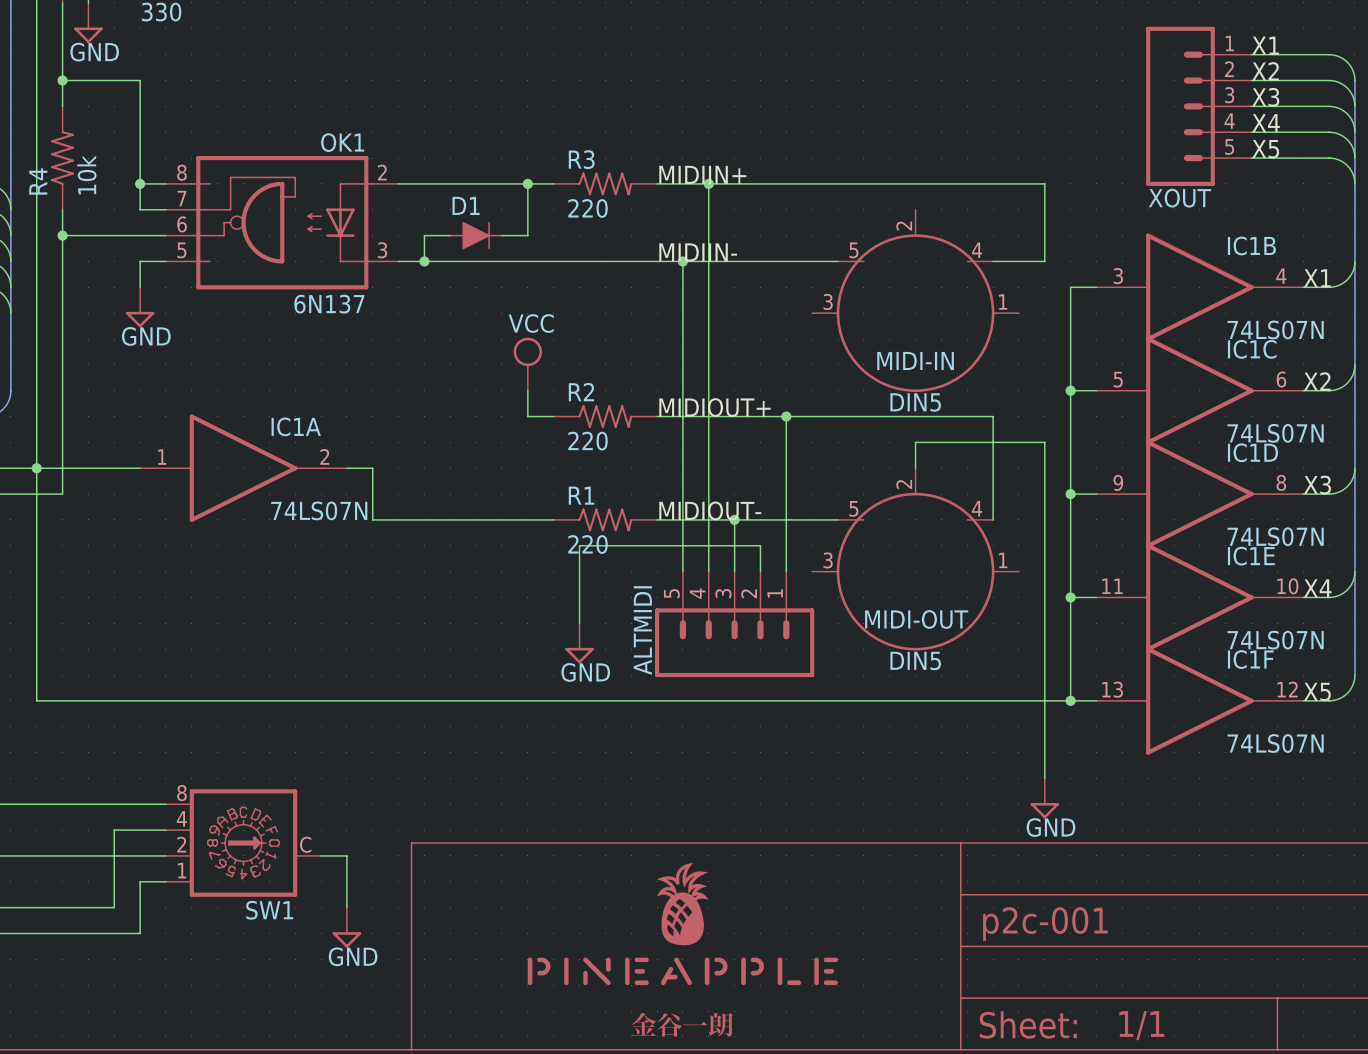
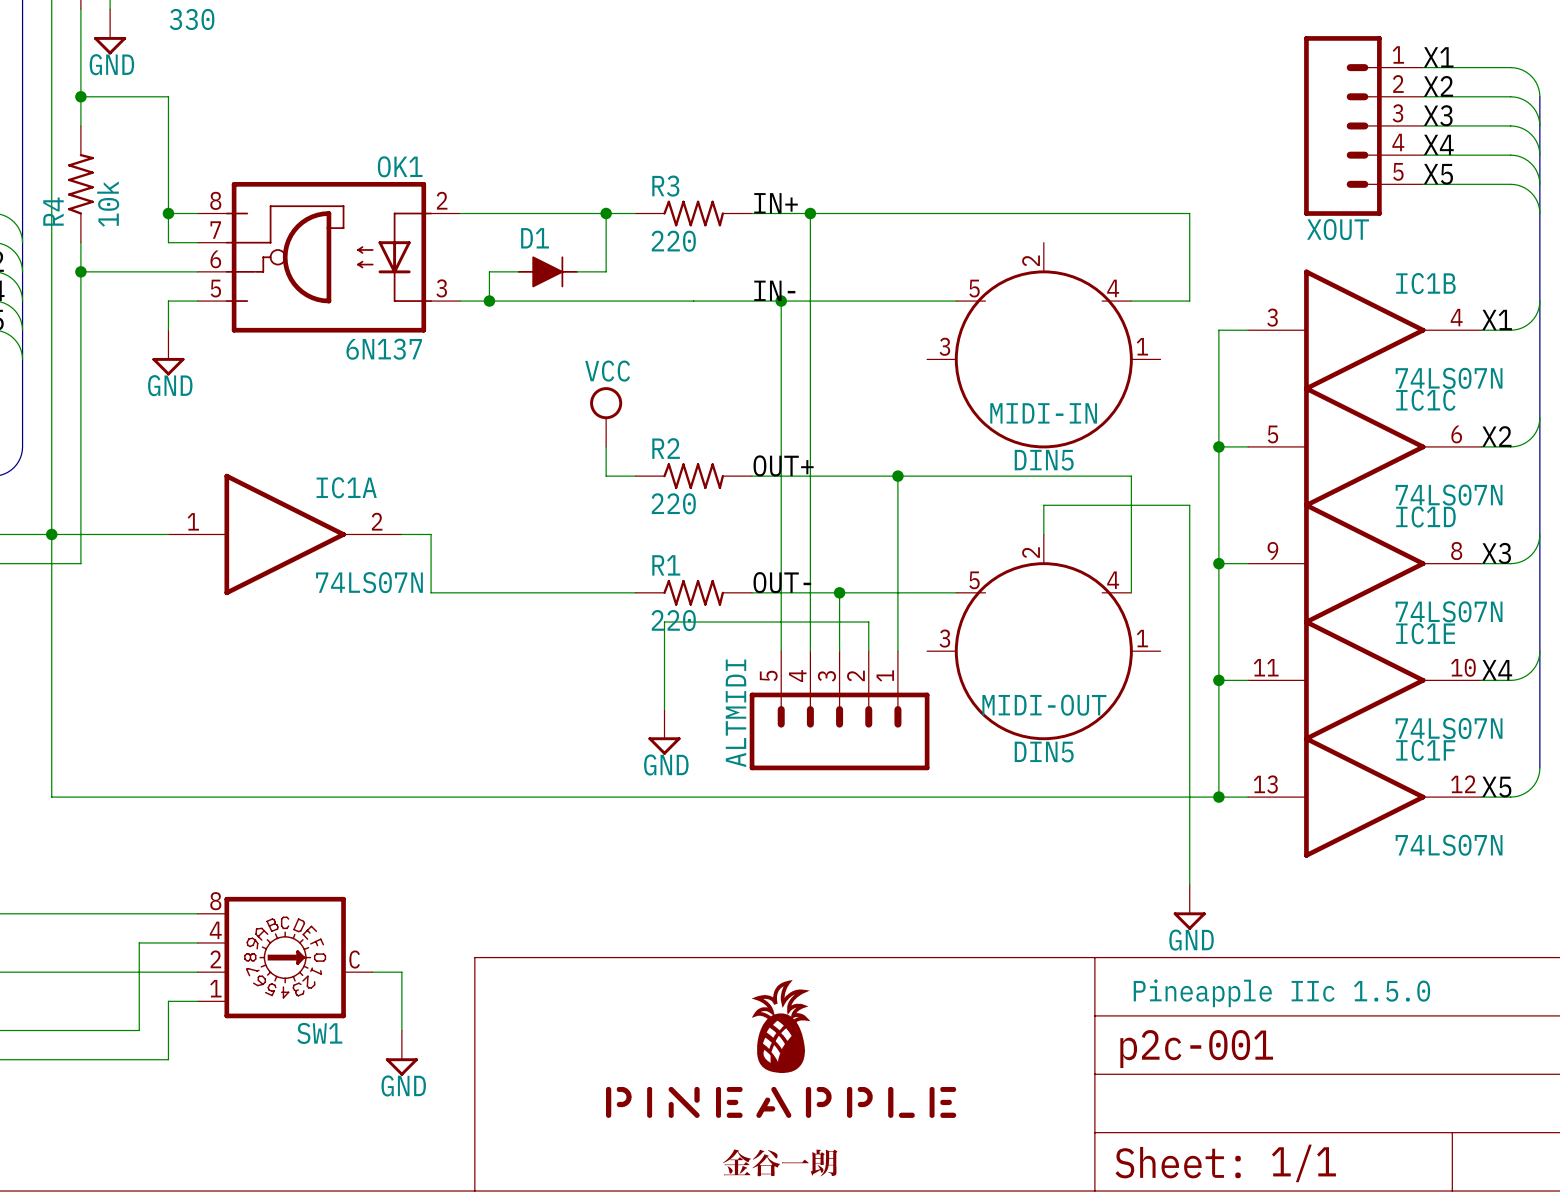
label: MIDIIN+ (702, 174) -> IN+ (776, 203)
label: MIDIIN- (698, 252) -> IN- (774, 290)
label: MIDIOUT+ (714, 407) -> OUT+ (783, 465)
label: MIDIOUT- (710, 510) -> OUT- (782, 582)
text: none -> Pineapple IIc 1.5.0 (1281, 993)

